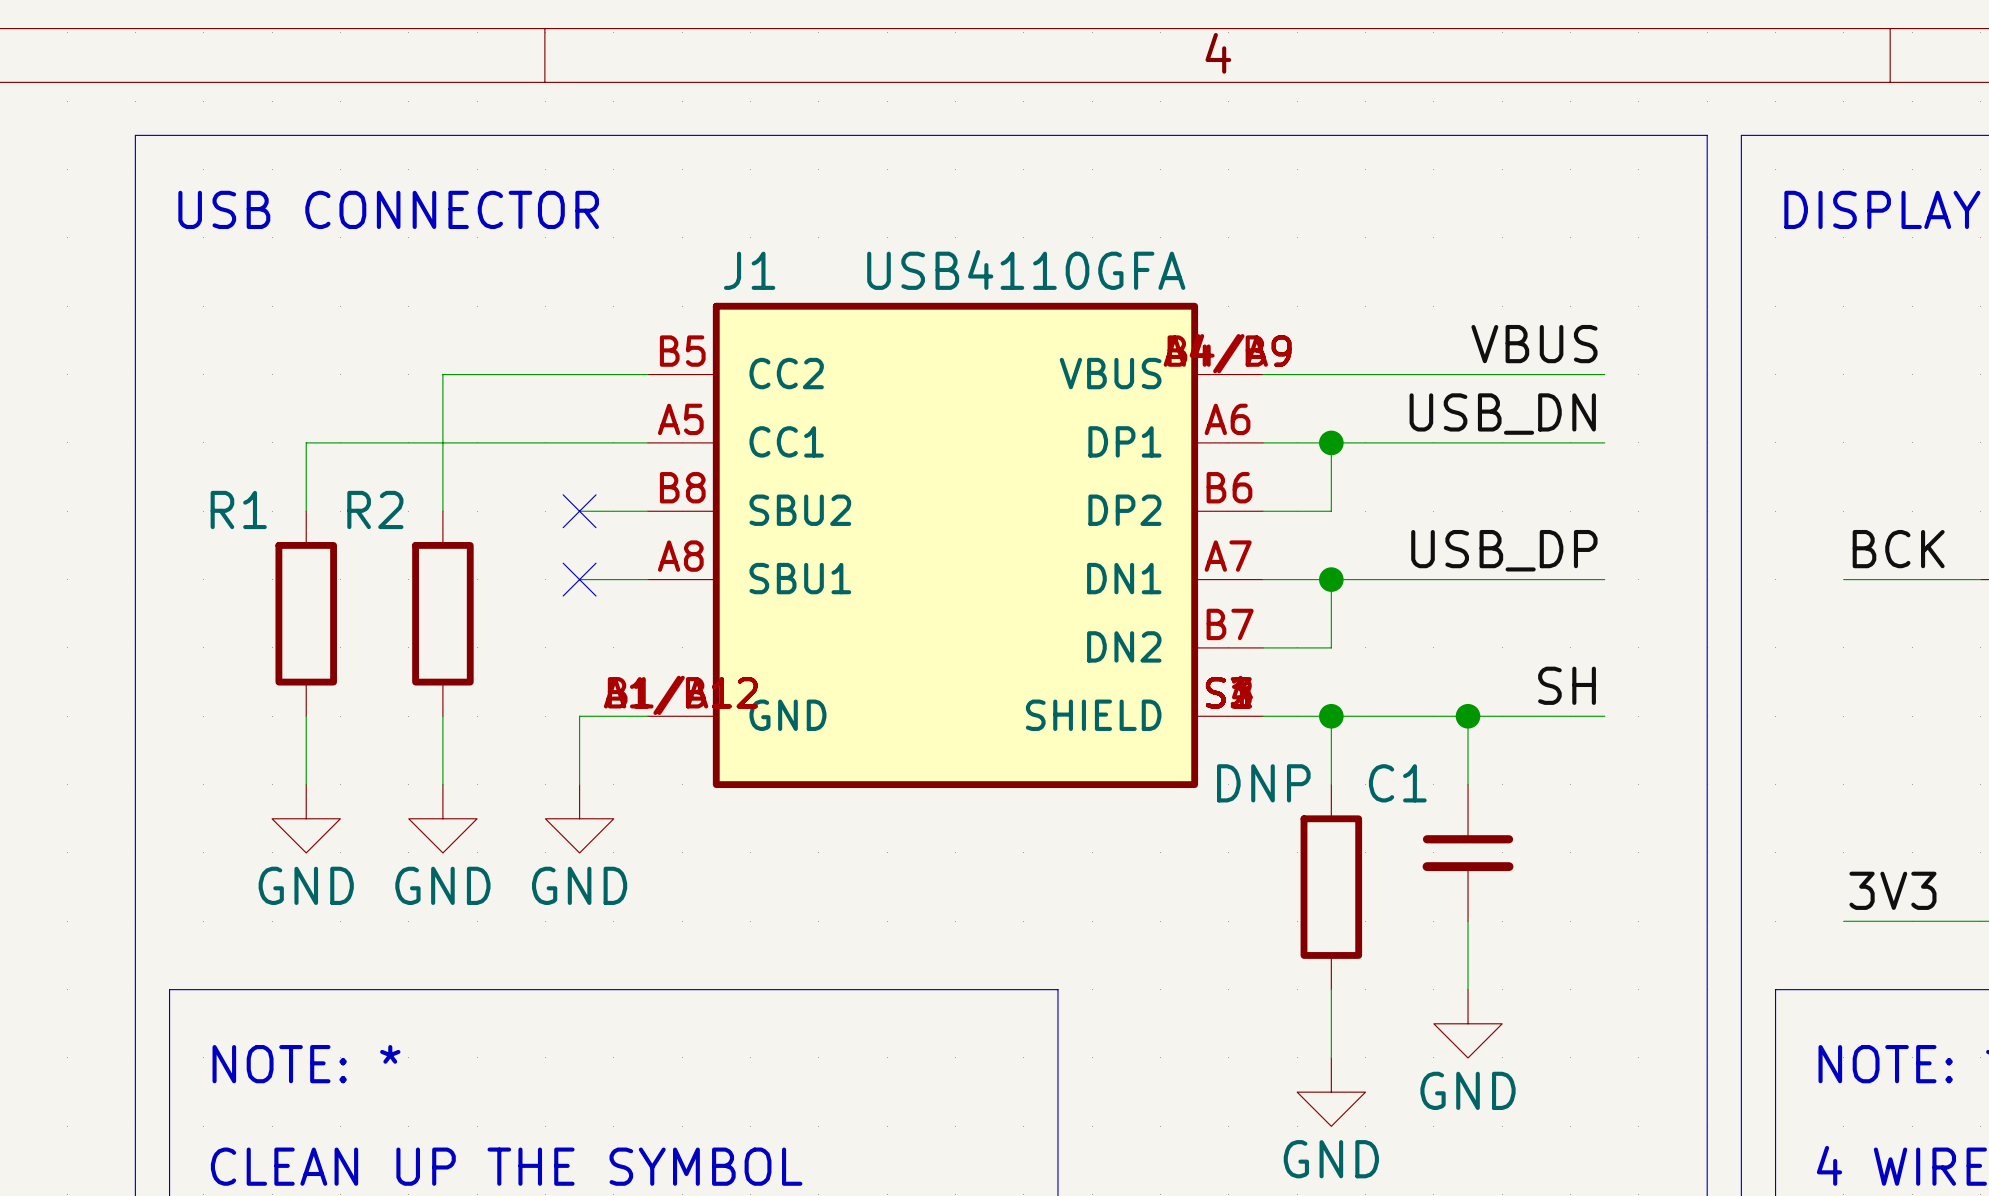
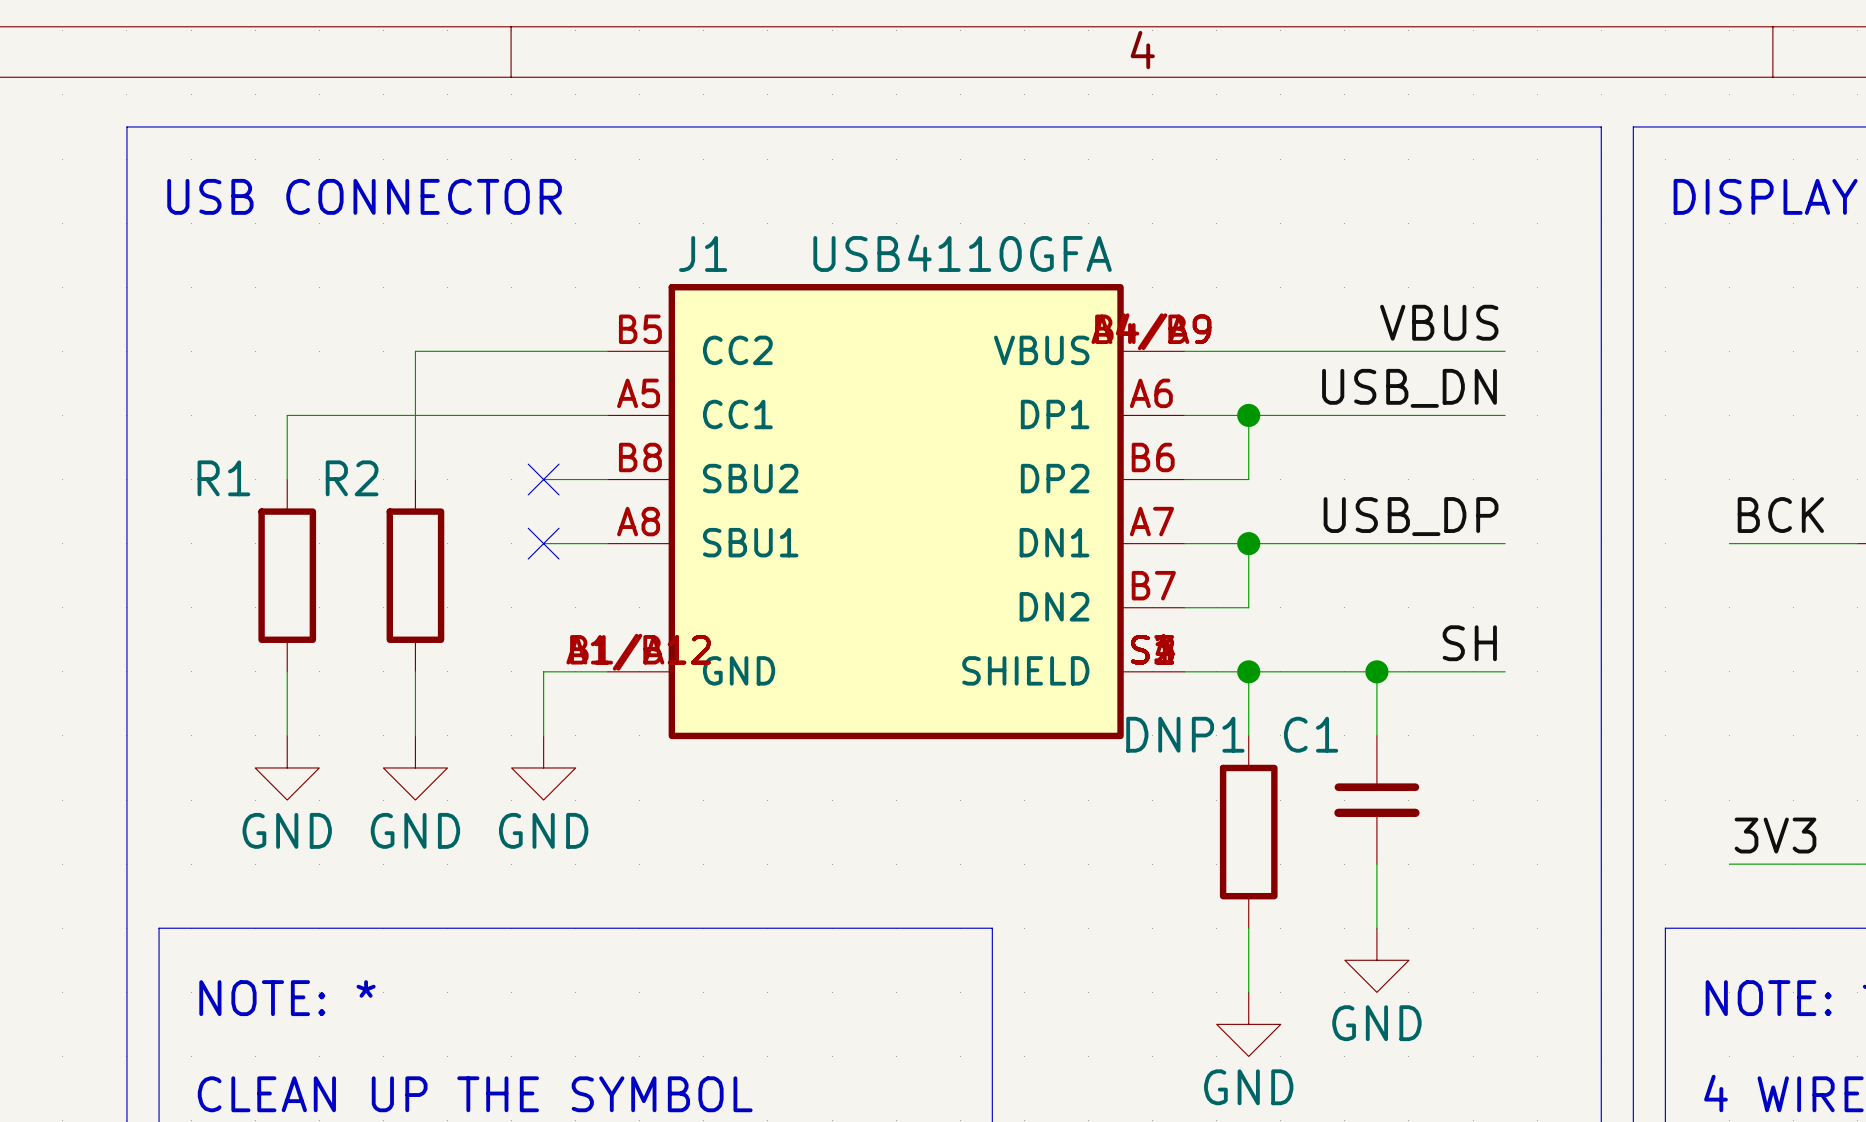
DNP name: DNP (1263, 783) -> DNP1 (1185, 734)

